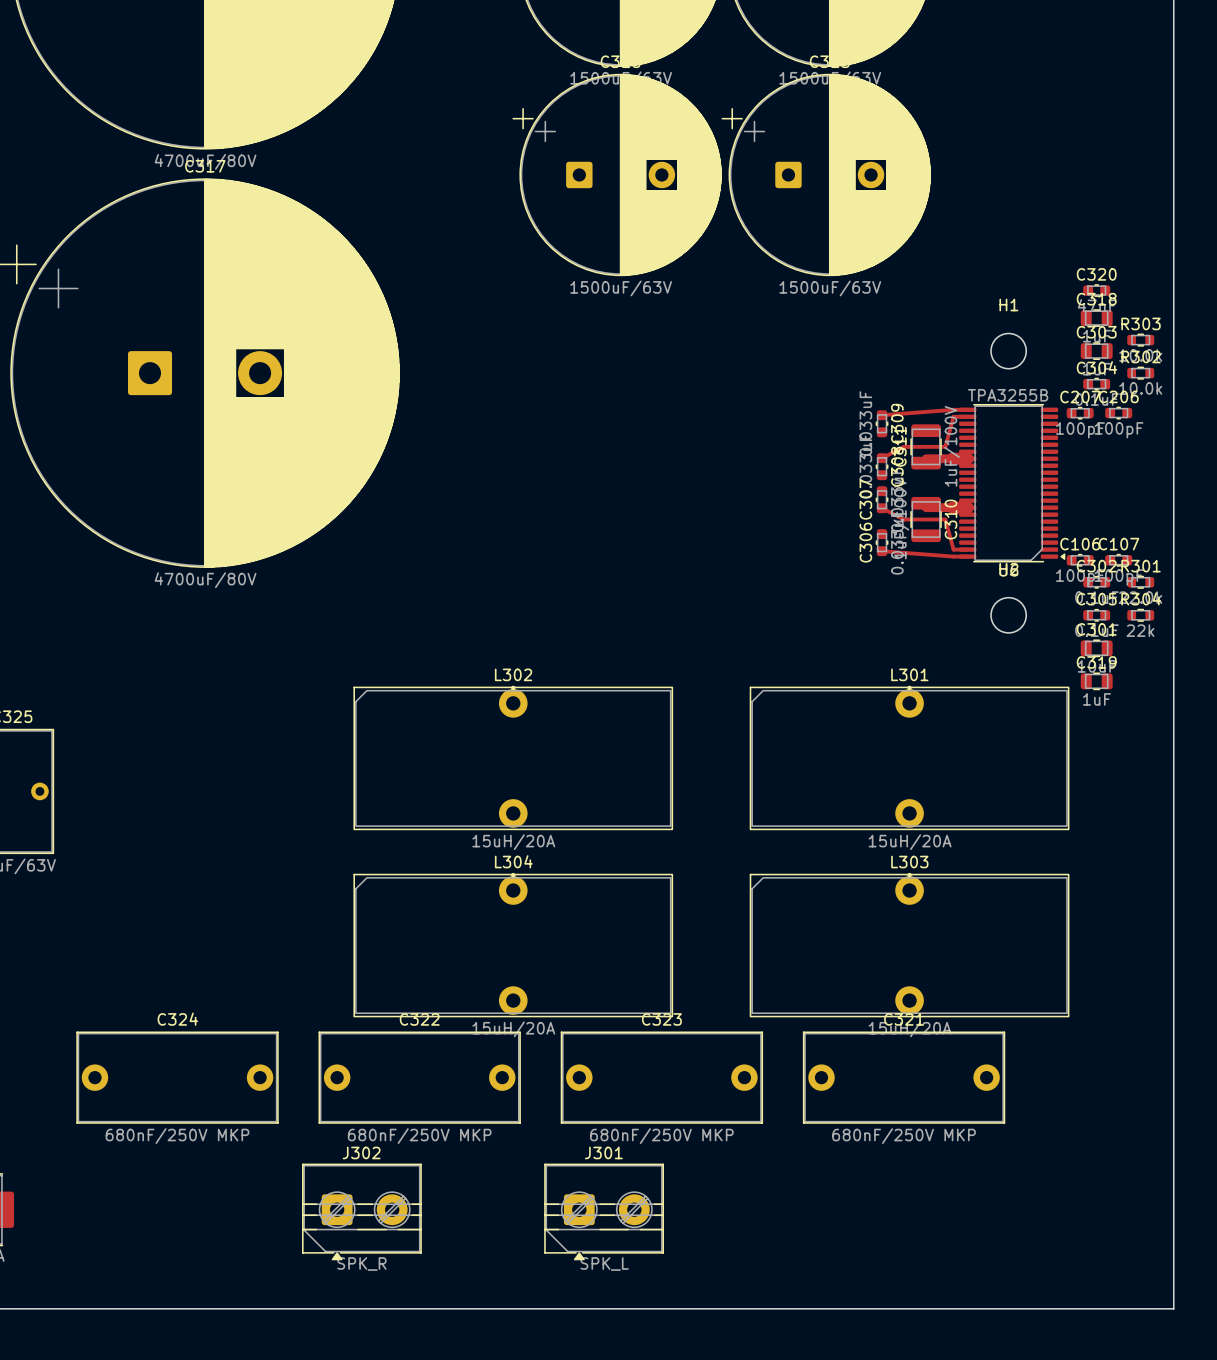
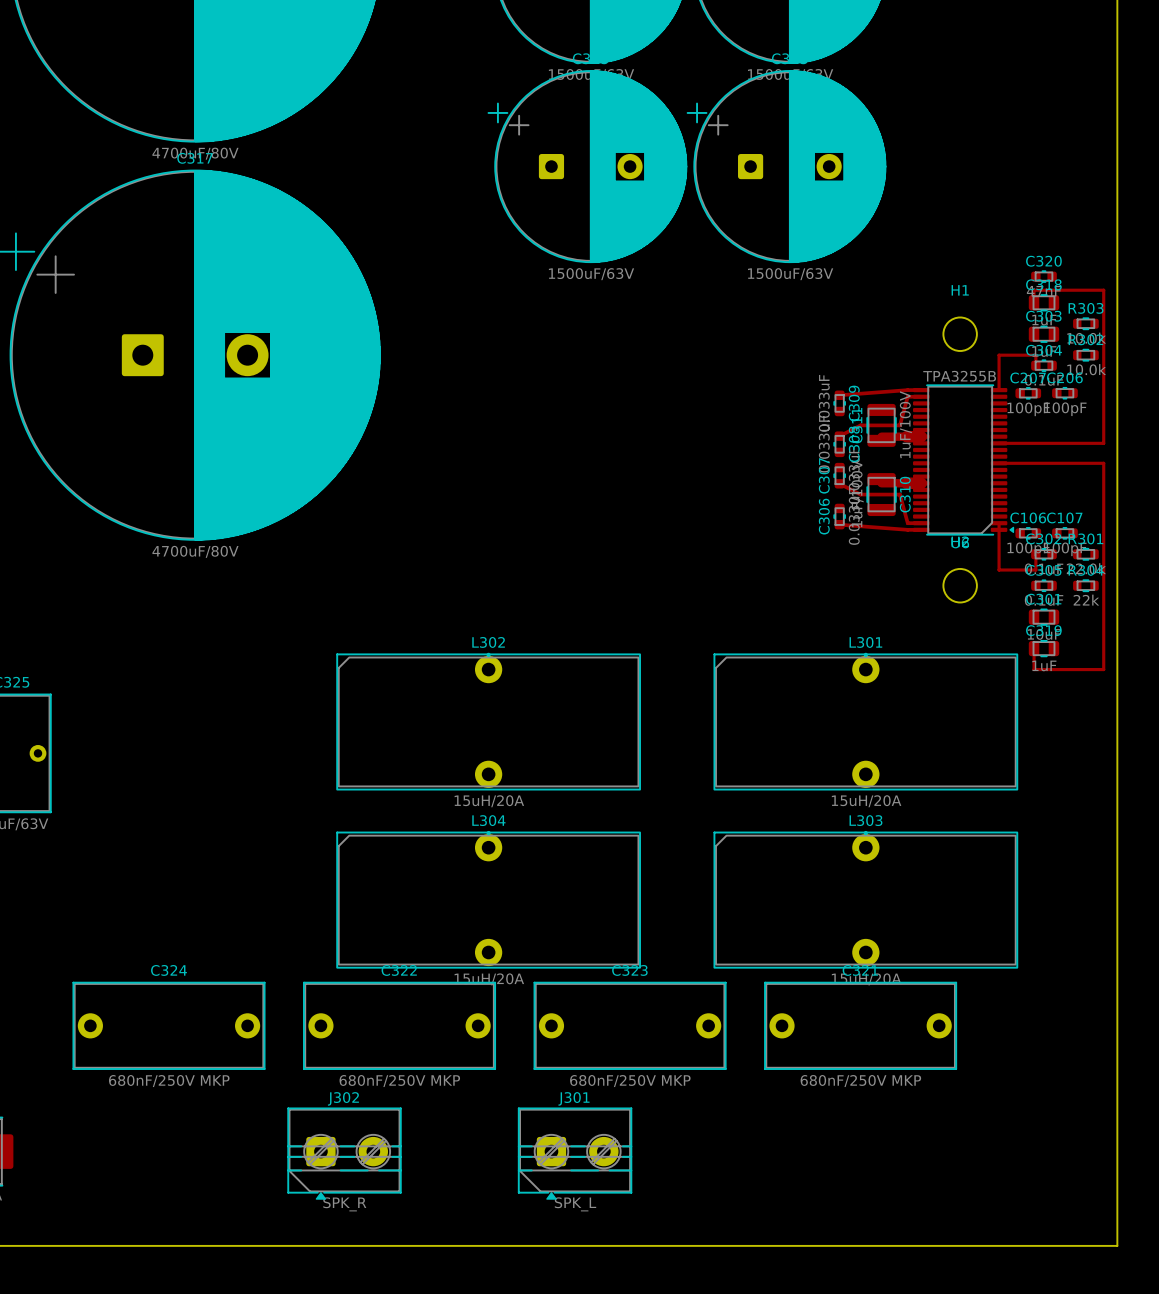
track: none -> (1034, 302) (1034, 290) (1103, 290) (1103, 443) (999, 443)
track: none -> (1035, 365) (1035, 355) (999, 355) (999, 390)
track: none -> (999, 463) (1103, 463) (1103, 669) (1034, 669) (1034, 648)
track: none -> (999, 523) (999, 570) (1035, 570) (1035, 554)

